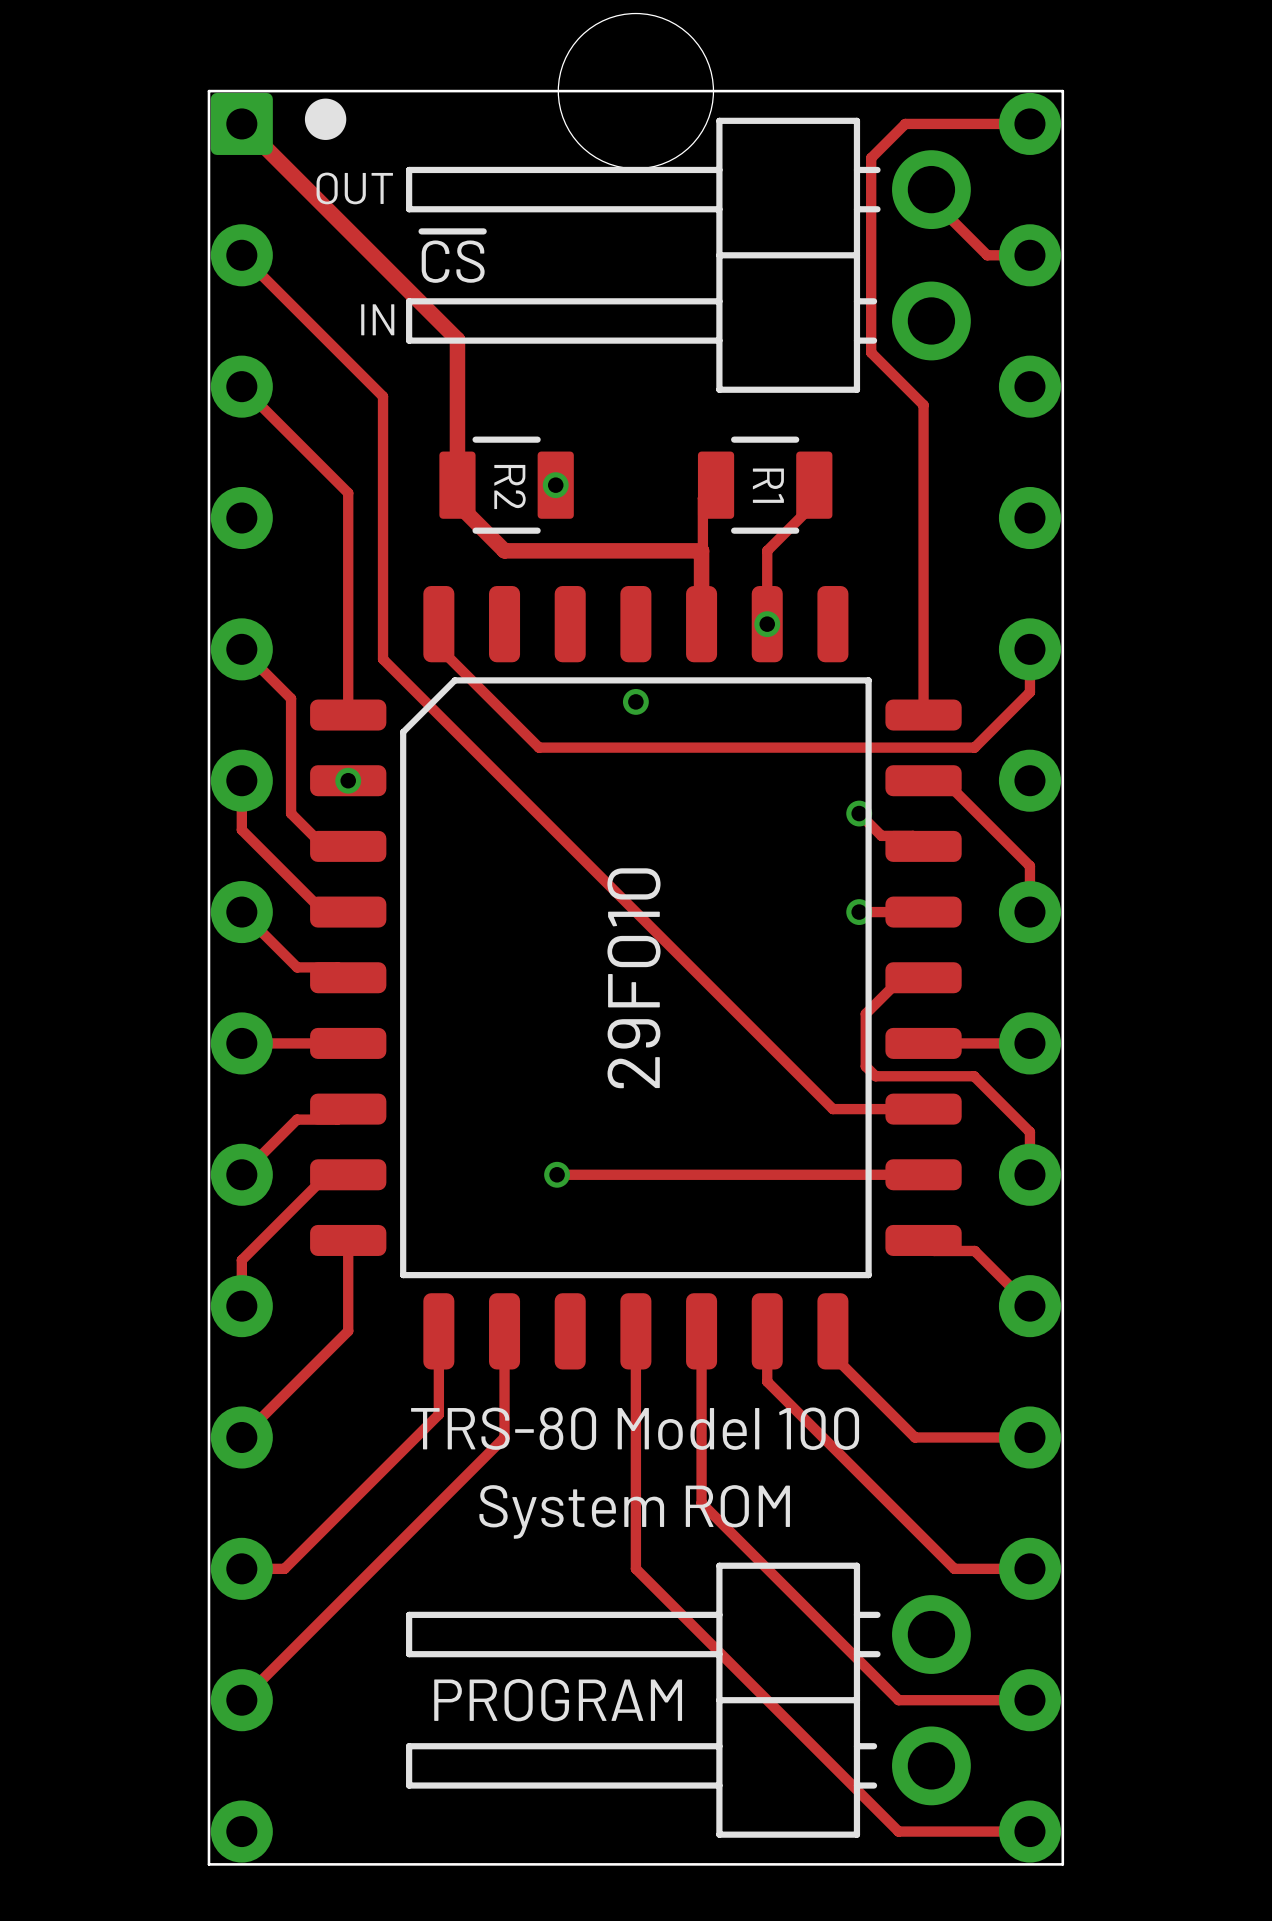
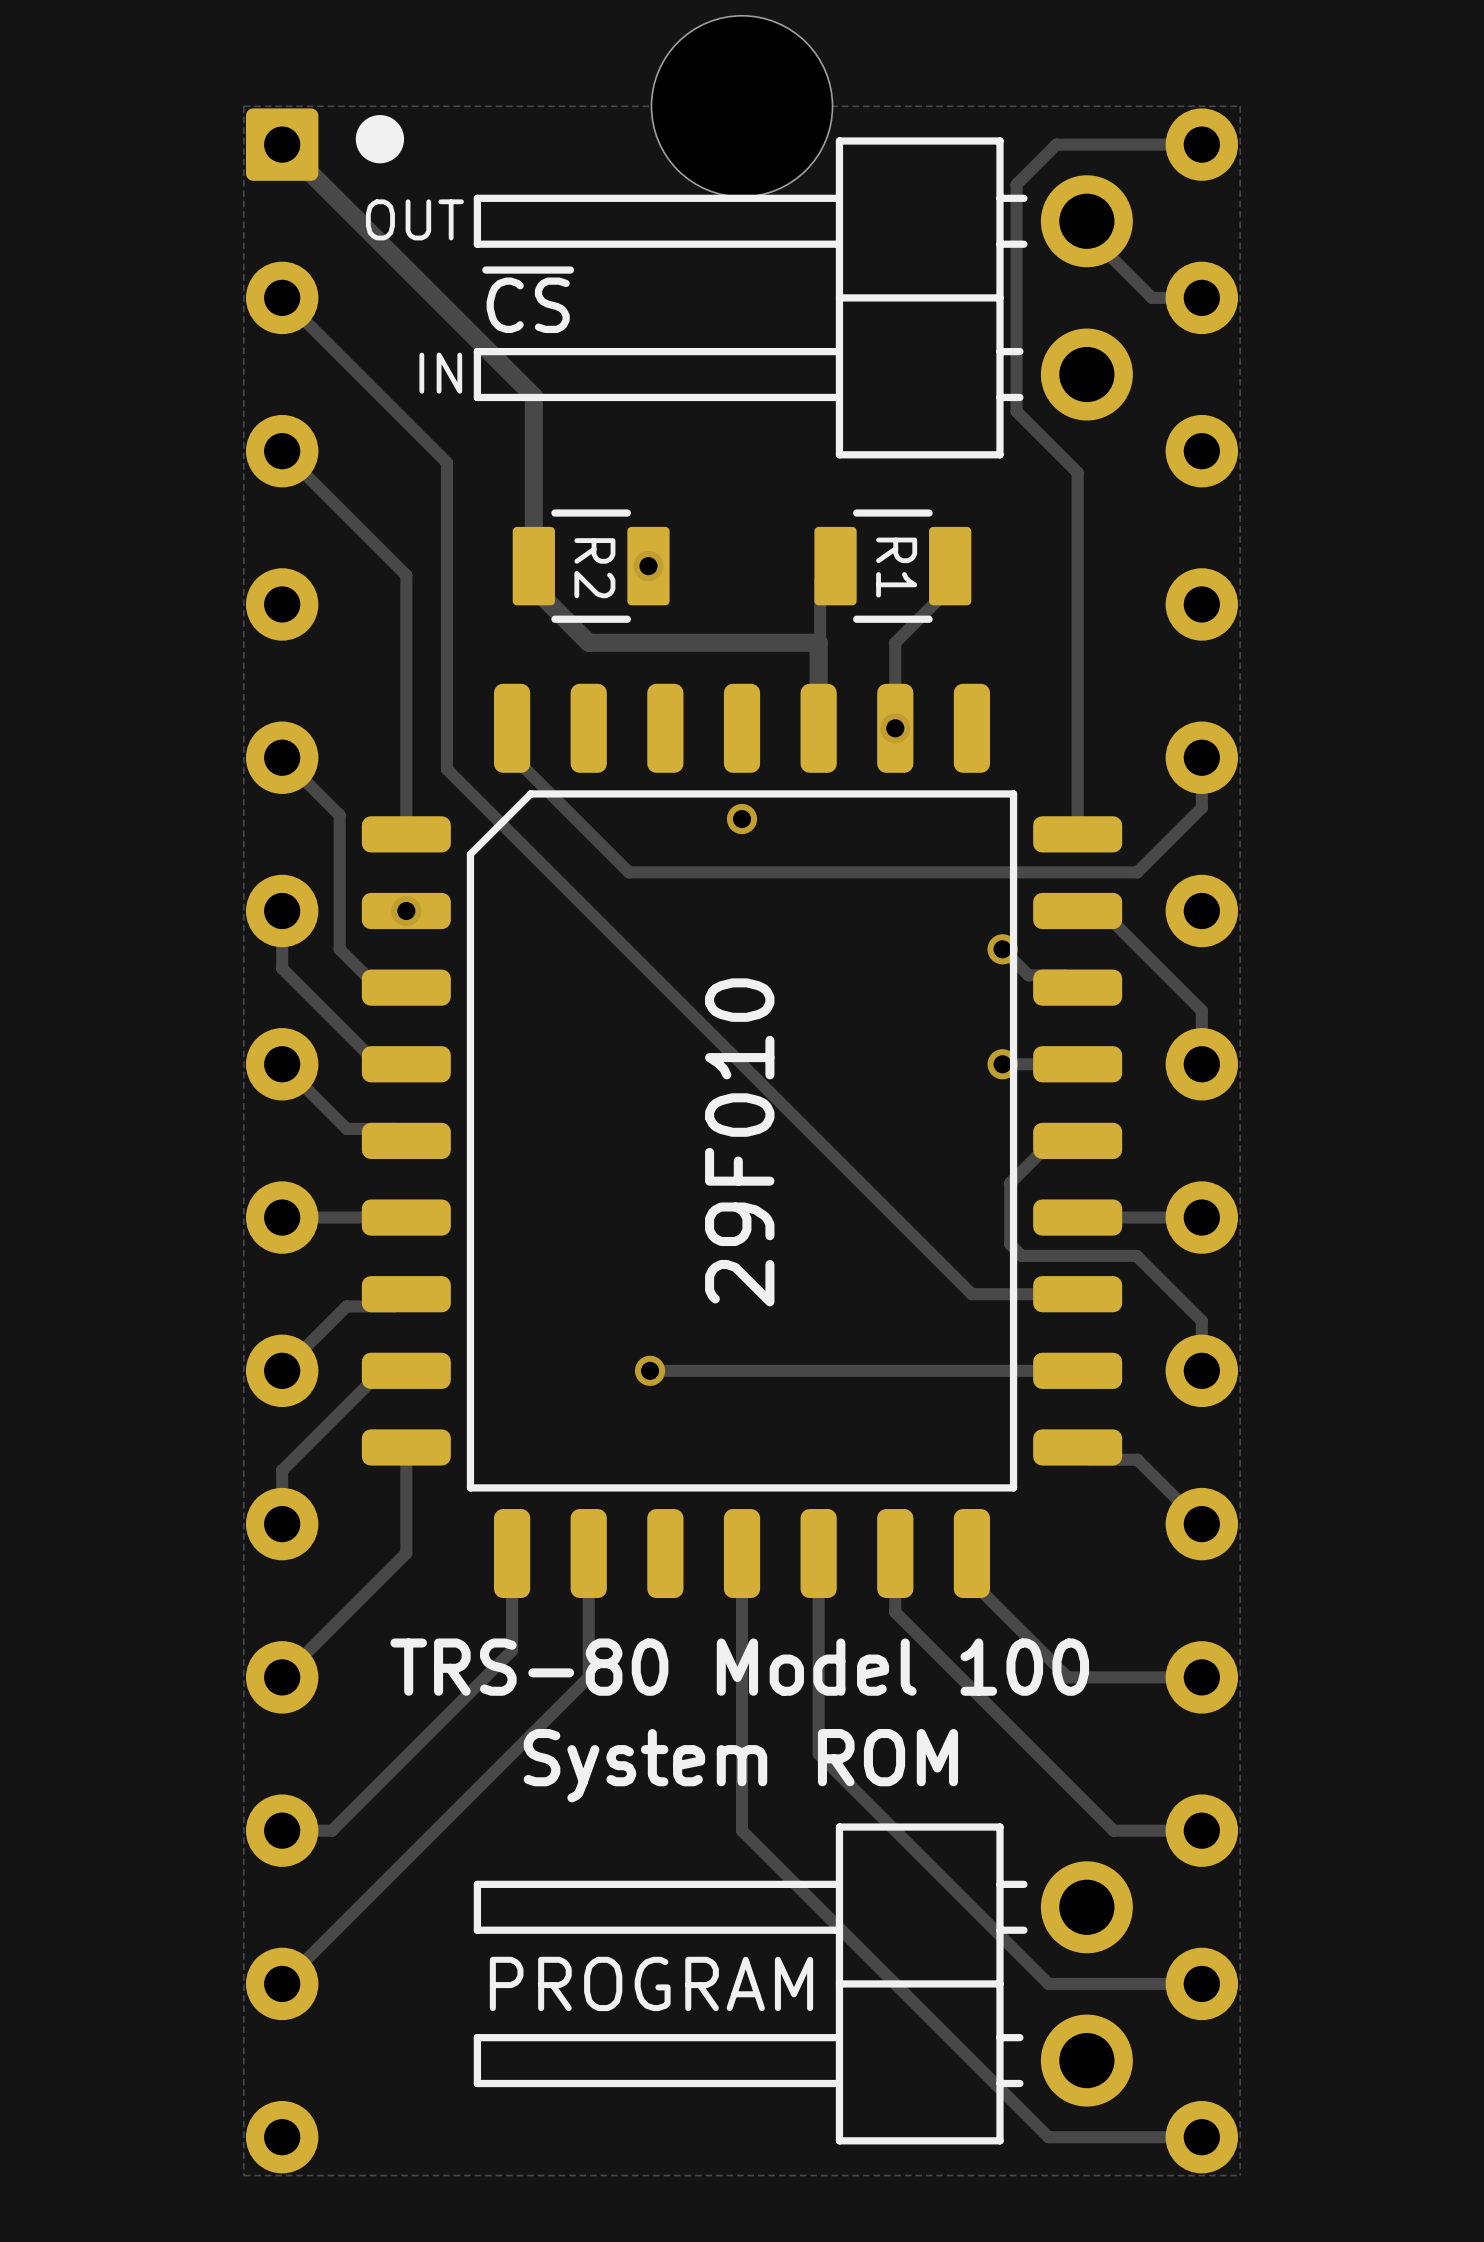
board edge: (208, 91) (208, 1864) (1062, 1864) (1062, 91) (208, 91) -> none

